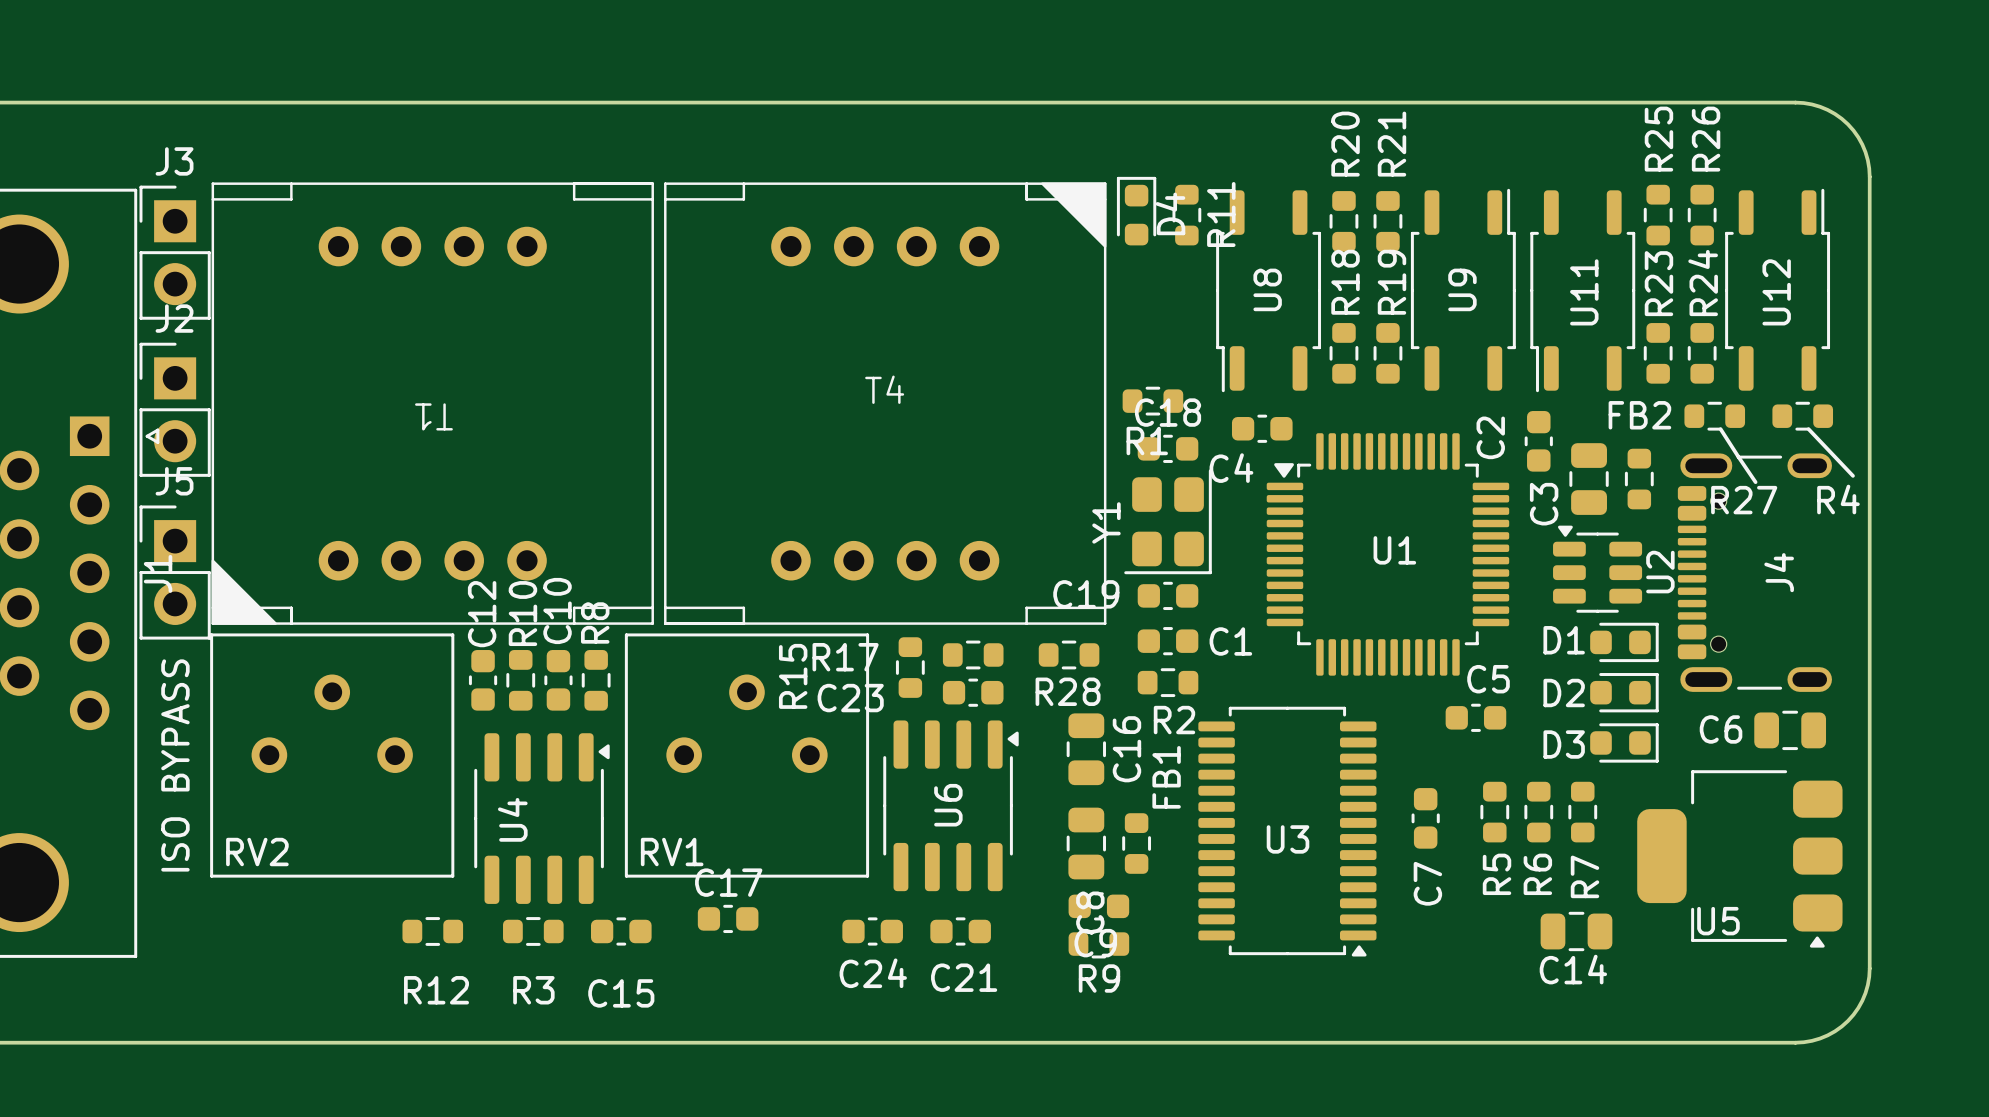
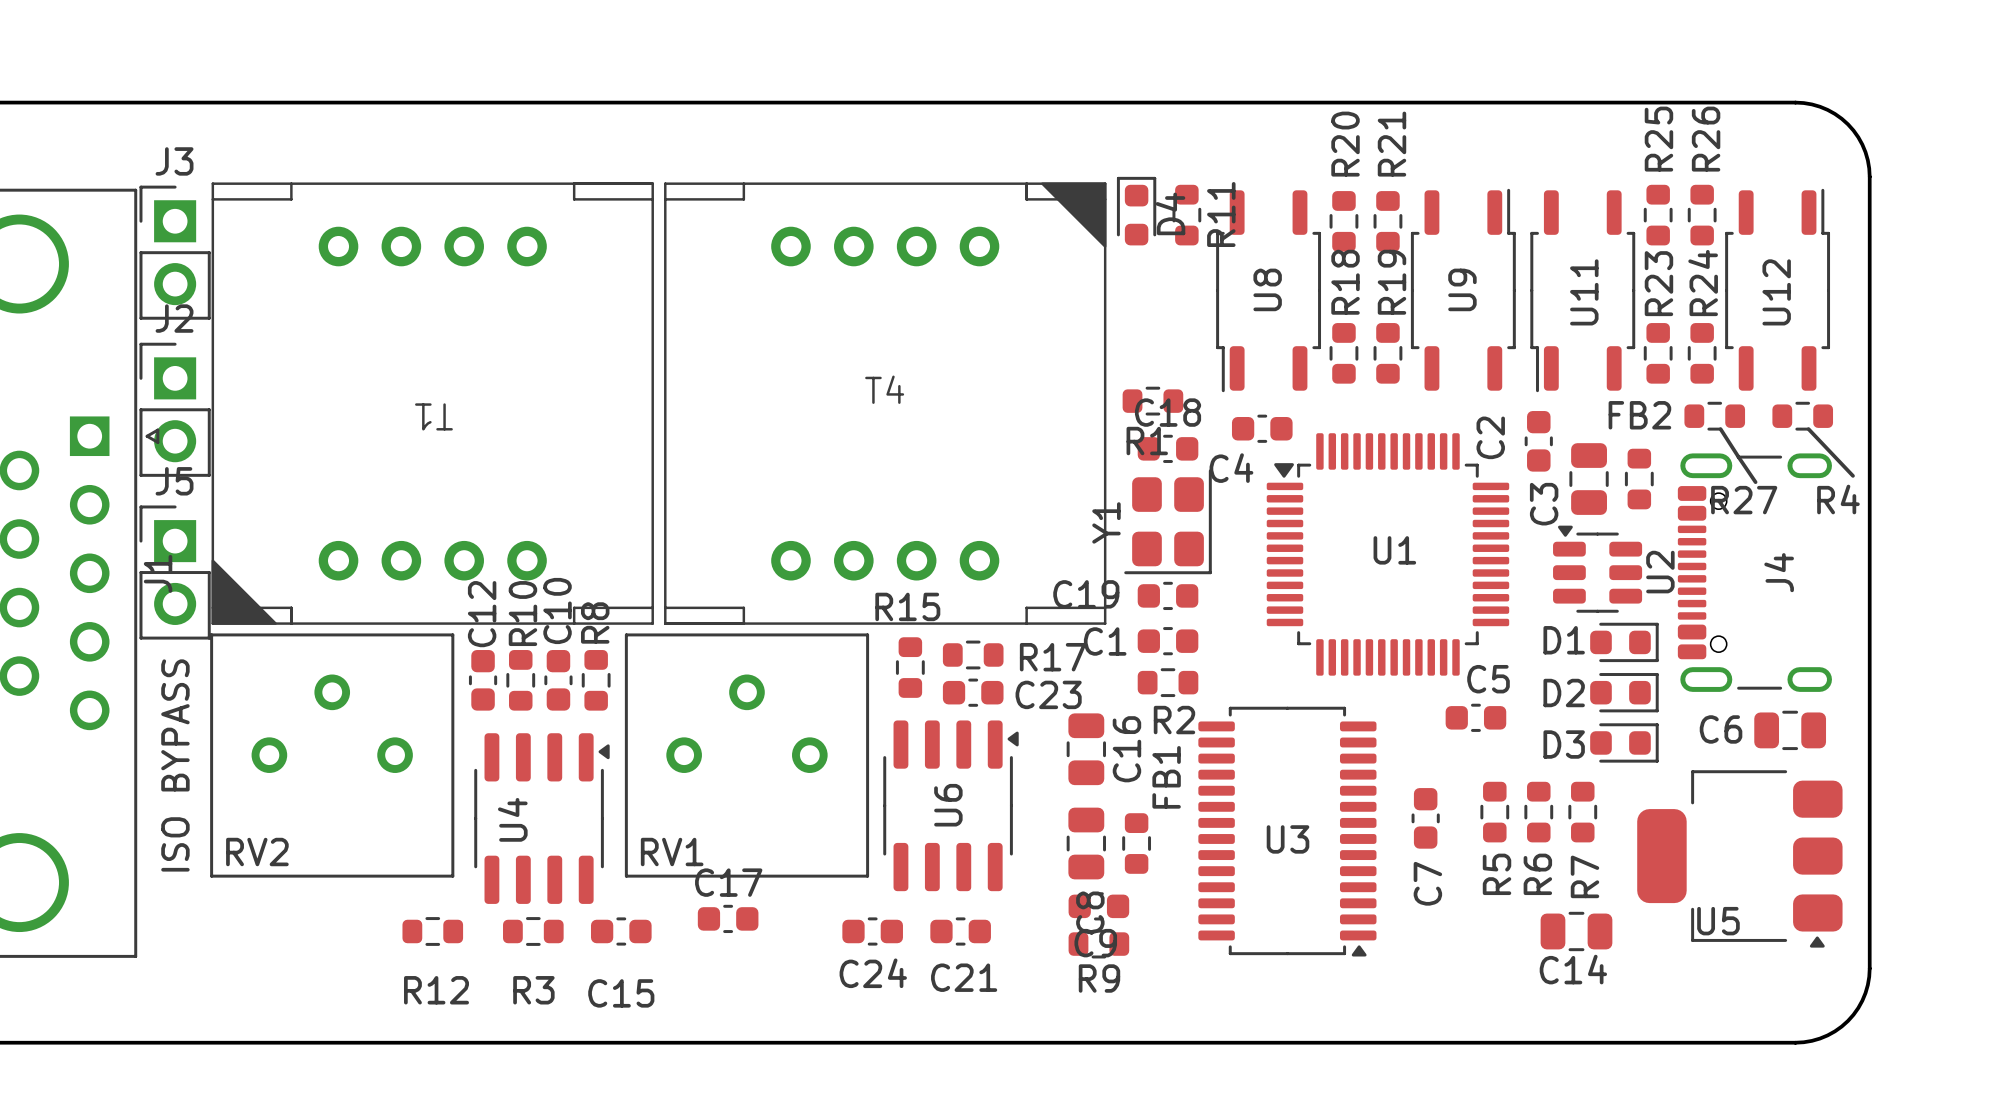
C1 name position: C1 (1230, 641) -> C1 (1105, 641)
R28: (1069, 654) -> none
R17 name position: R17 (845, 657) -> R17 (1052, 657)
R15 name rotation: 0° (793, 676) -> 90° clockwise (907, 606)
R15 name position: R15 (793, 676) -> R15 (907, 606)
C23 name position: C23 (850, 698) -> C23 (1048, 694)

